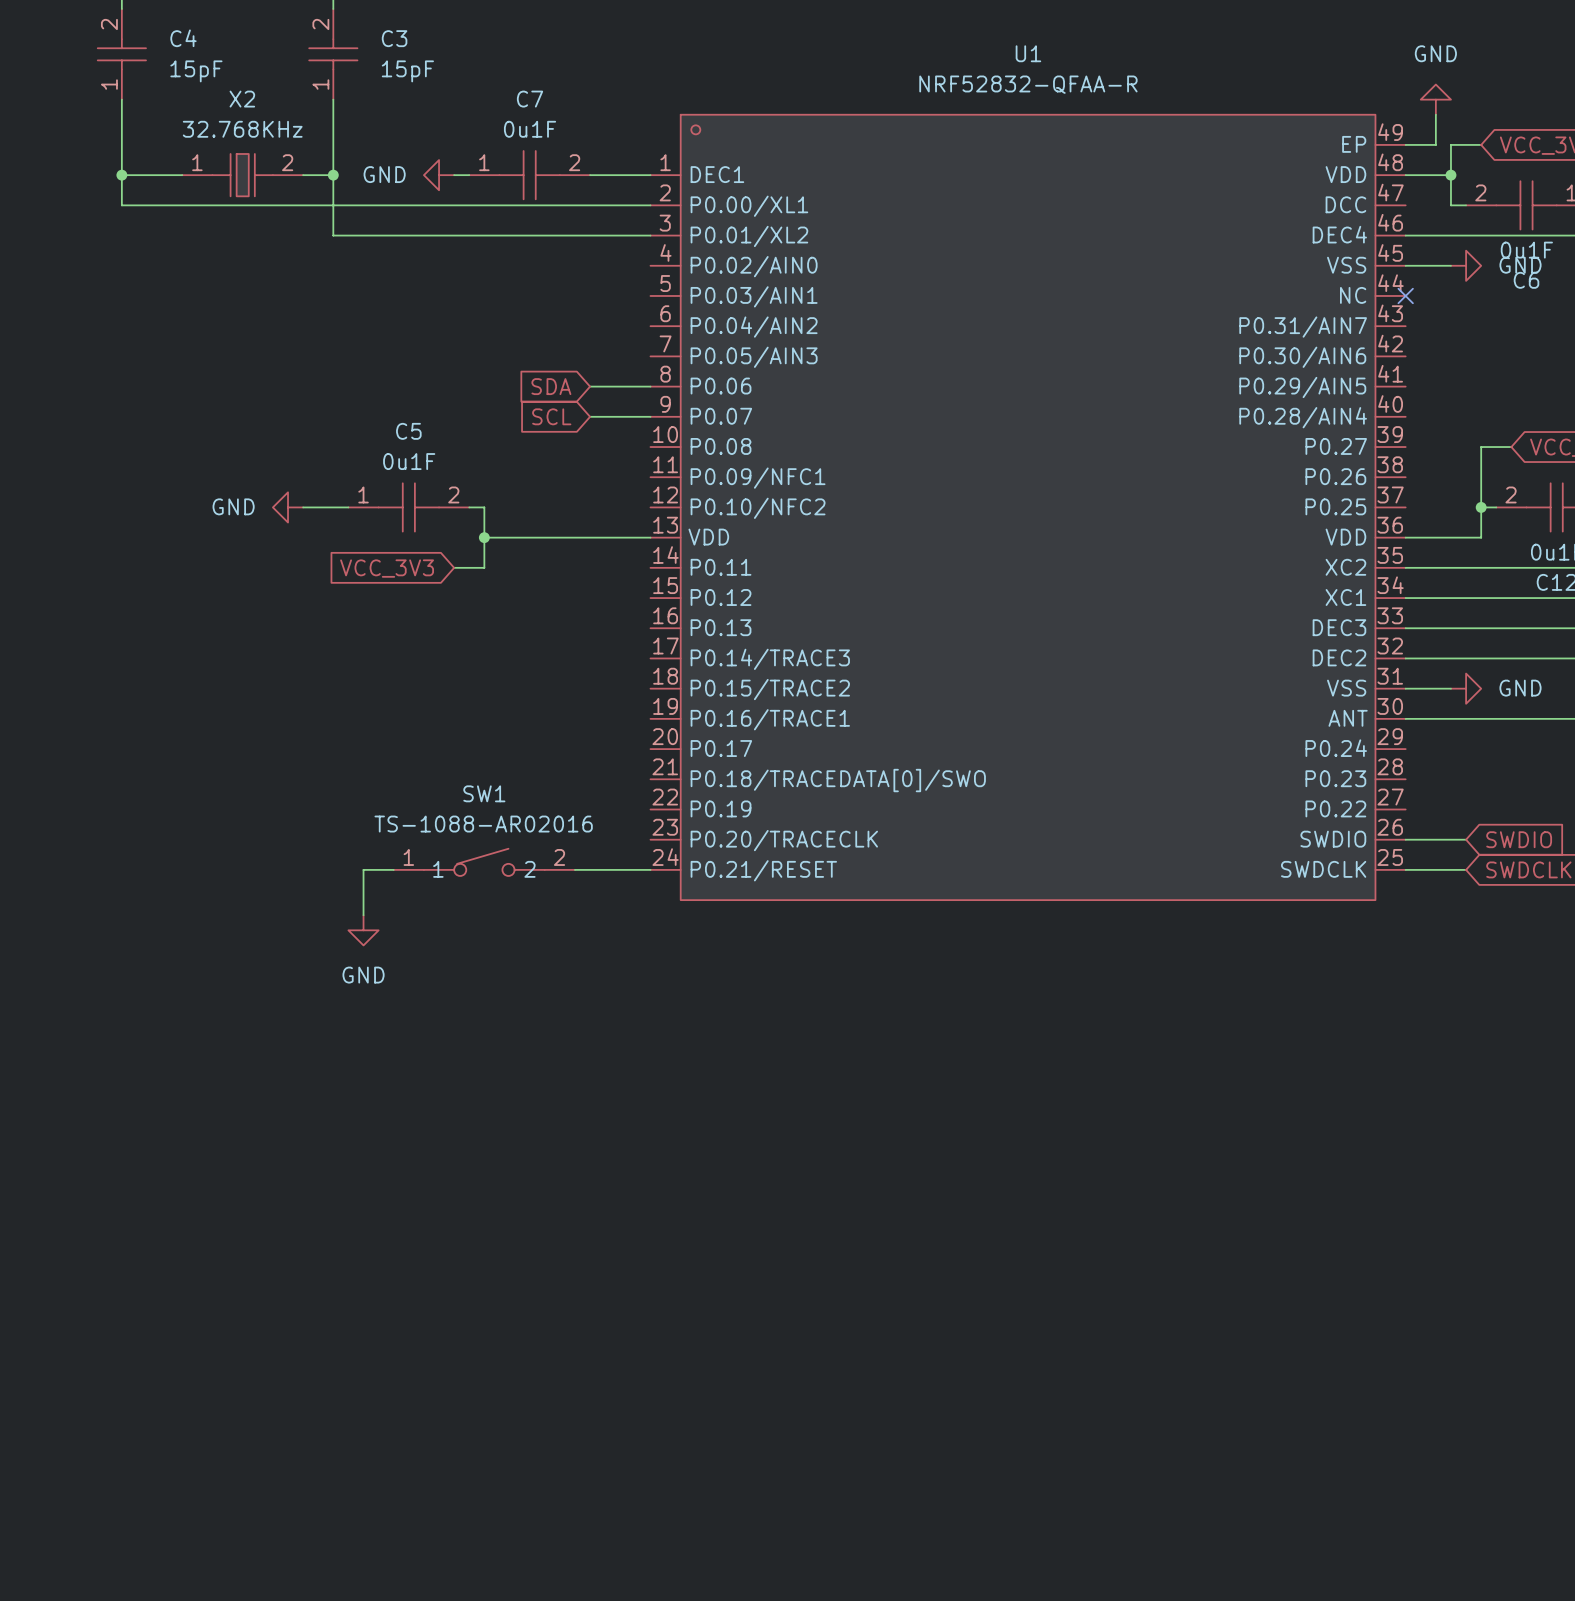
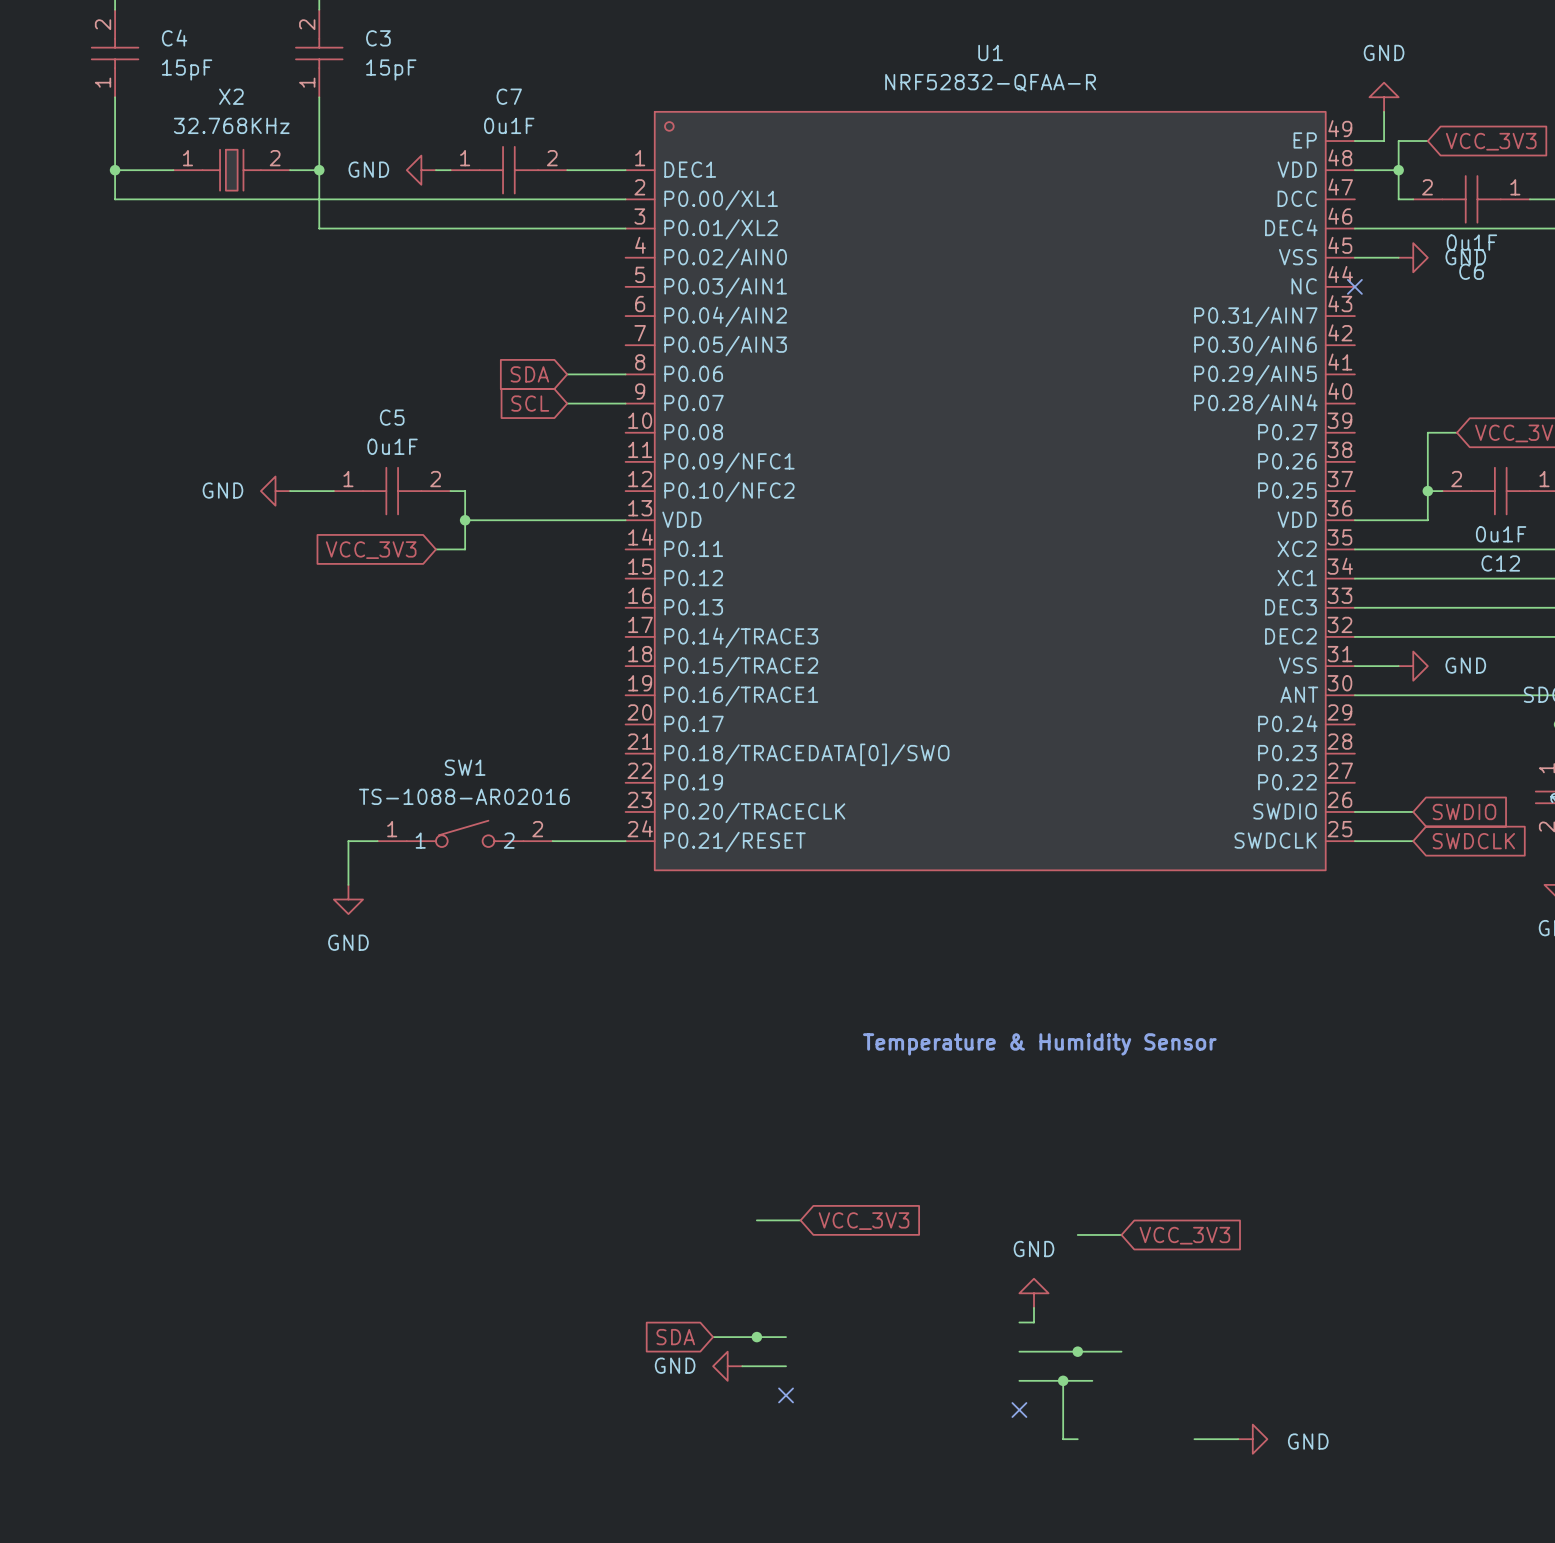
text: none -> Temperature & Humidity Sensor (1039, 1044)
wire: none -> (756, 1220) (800, 1220)
global label: none -> VCC_3V3 (864, 1221)
wire: none -> (1077, 1234) (1121, 1234)
global label: none -> VCC_3V3 (1184, 1235)
power symbol: none -> GND (1034, 1293)
wire: none -> (1034, 1307) (1034, 1322) (1019, 1322)
global label: none -> SDA (675, 1337)
wire: none -> (713, 1337) (786, 1337)
junction: none -> (756, 1337)
wire: none -> (1019, 1351) (1121, 1351)
junction: none -> (1077, 1351)
power symbol: none -> GND (727, 1366)
wire: none -> (742, 1366) (786, 1366)
wire: none -> (1019, 1380) (1092, 1380)
wire: none -> (1063, 1380) (1063, 1439) (1077, 1439)
junction: none -> (1063, 1380)
no-connect mark: none -> (786, 1395)
no-connect mark: none -> (1019, 1410)
wire: none -> (1194, 1439) (1238, 1439)
power symbol: none -> GND (1252, 1439)

